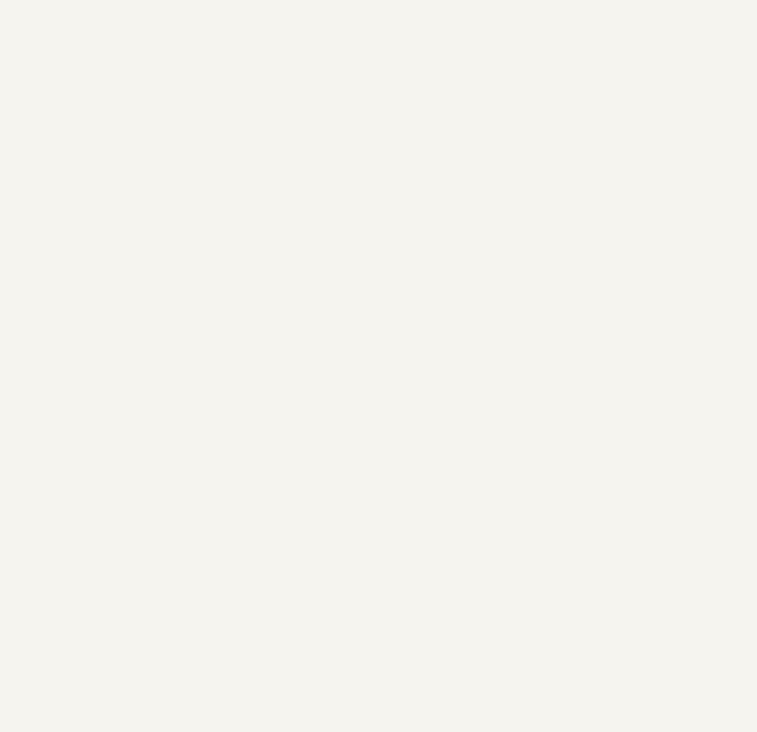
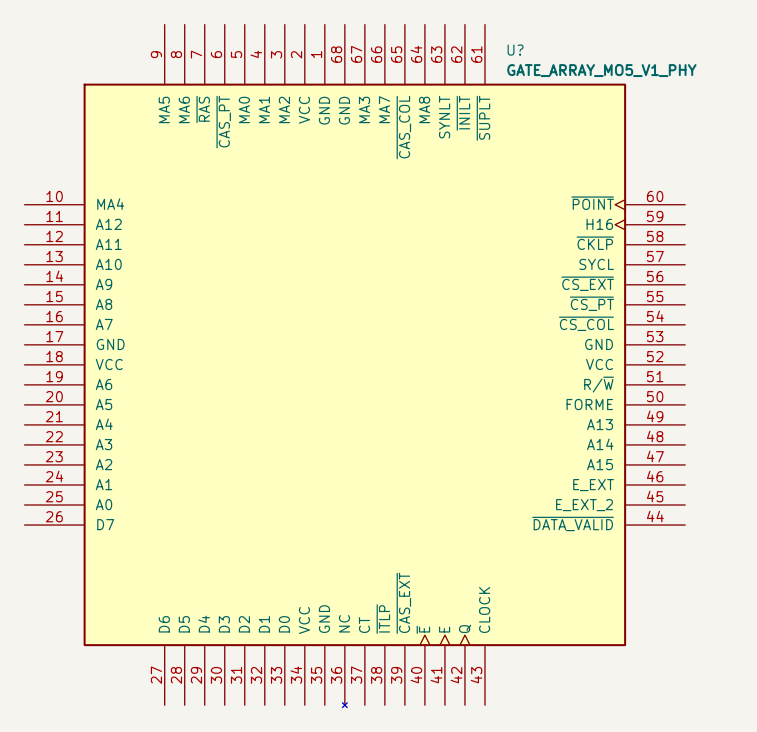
U?: none -> GATE_ARRAY_MO5_V1_PHY (354, 366)

